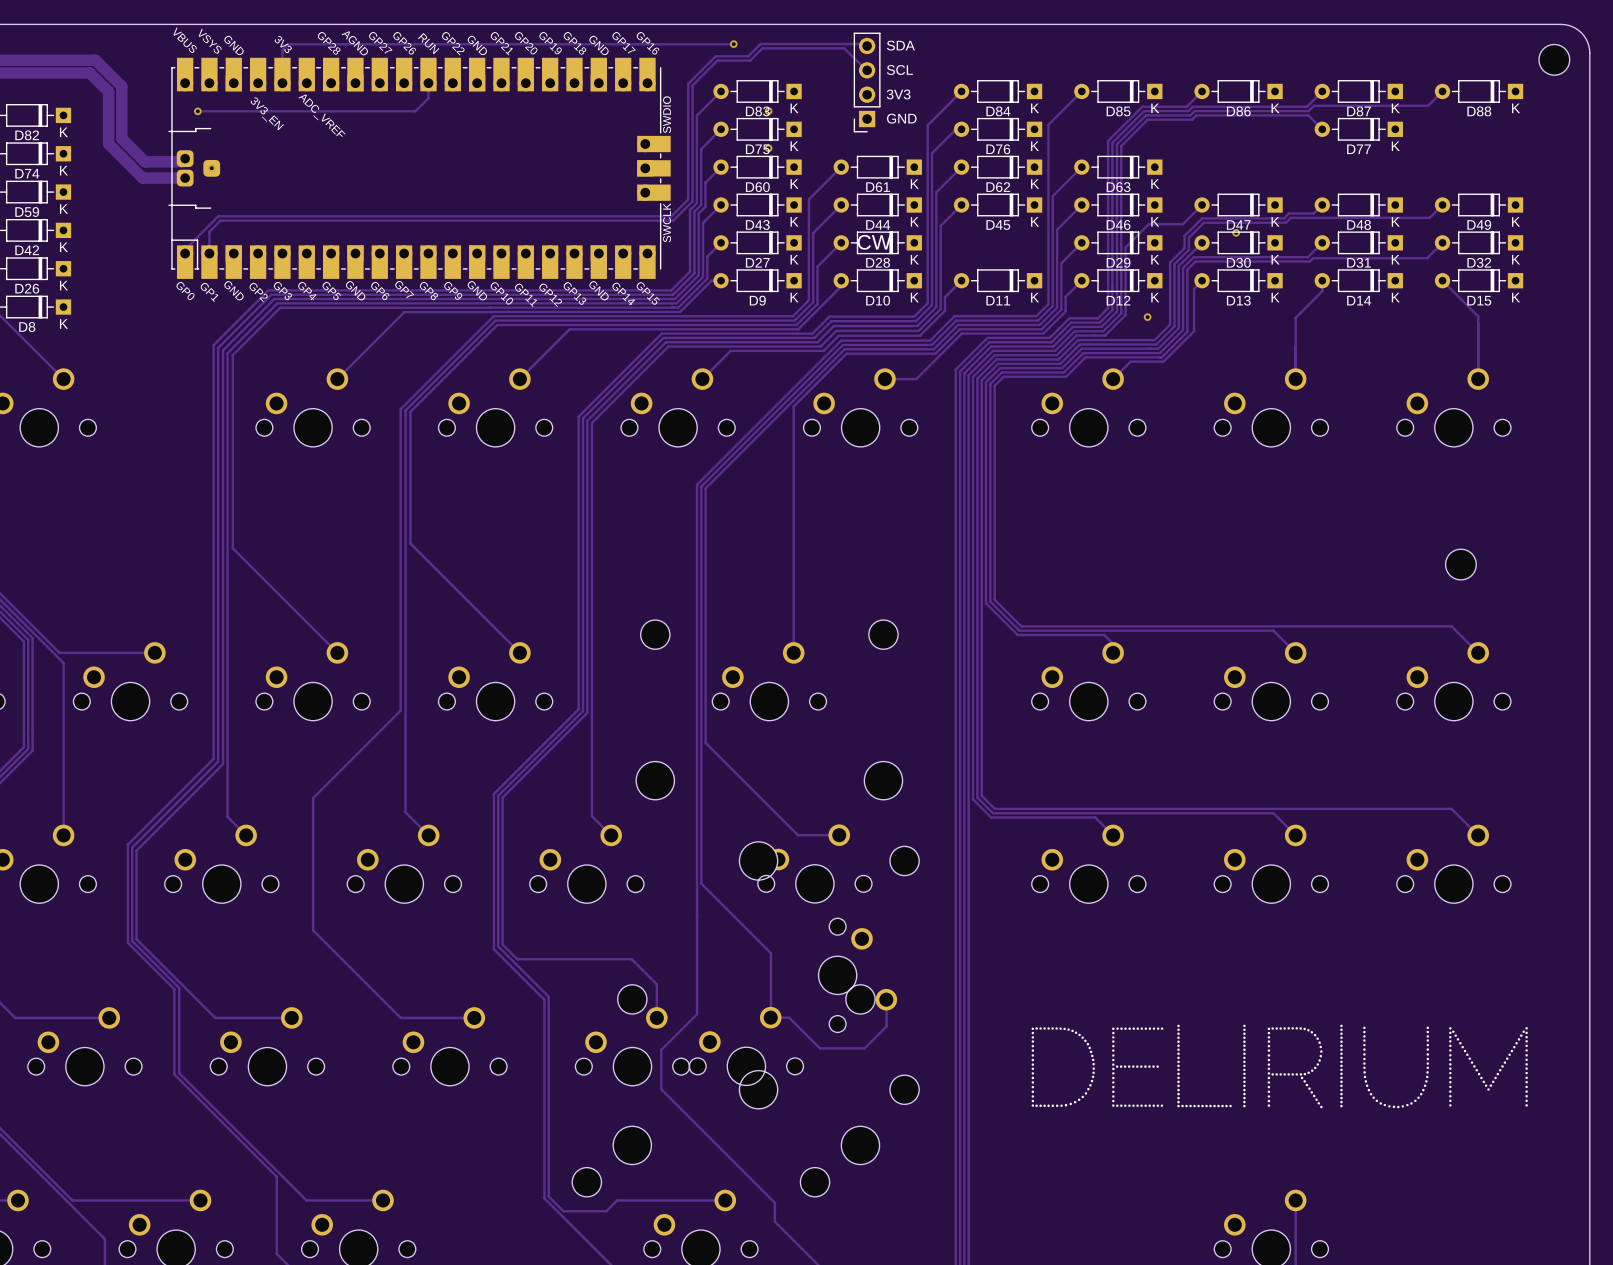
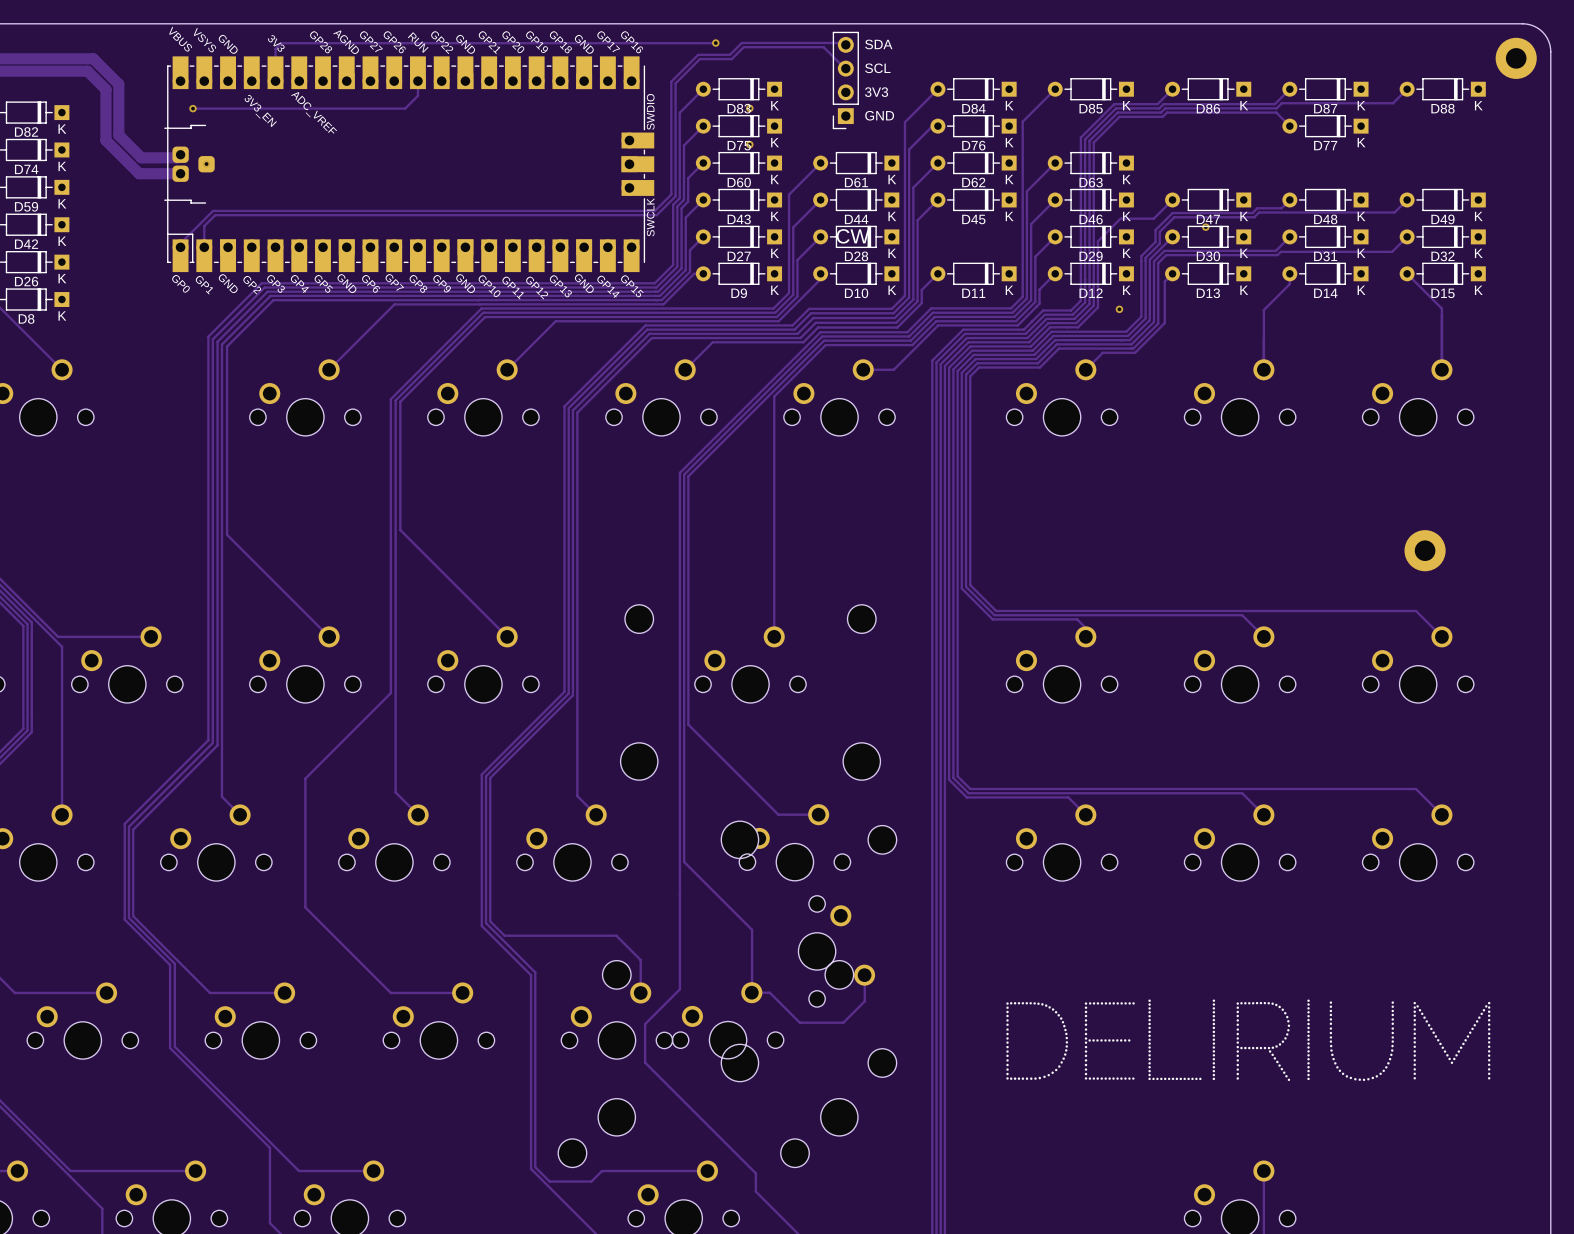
part footprint: [1539, 44, 1570, 76] -> [1495, 37, 1537, 79]
part footprint: [1445, 549, 1477, 580] -> [1404, 530, 1446, 572]

